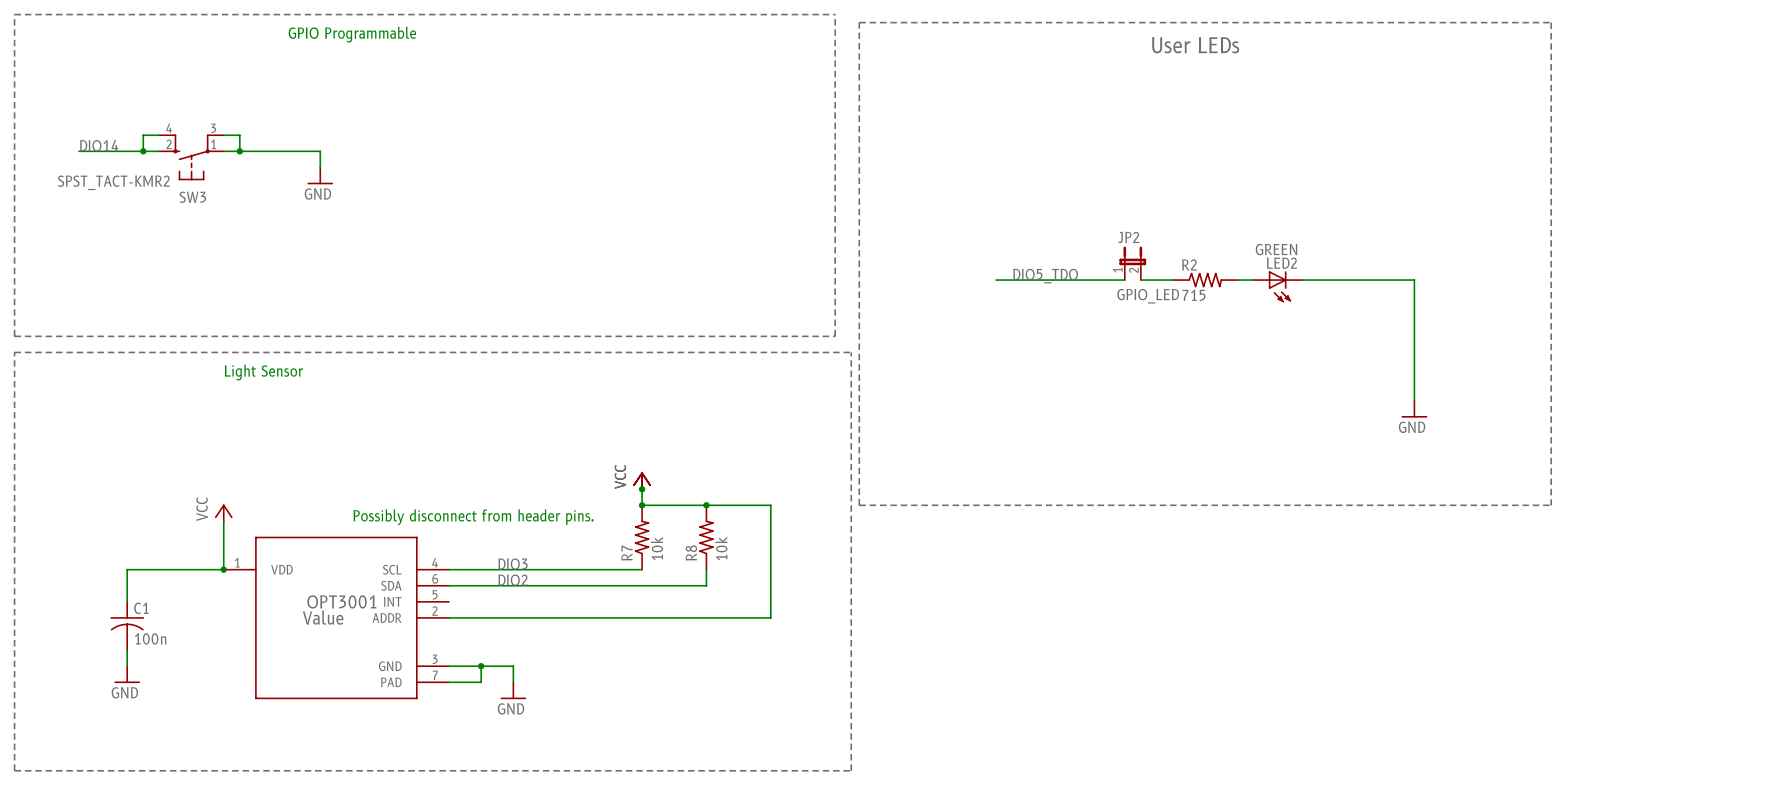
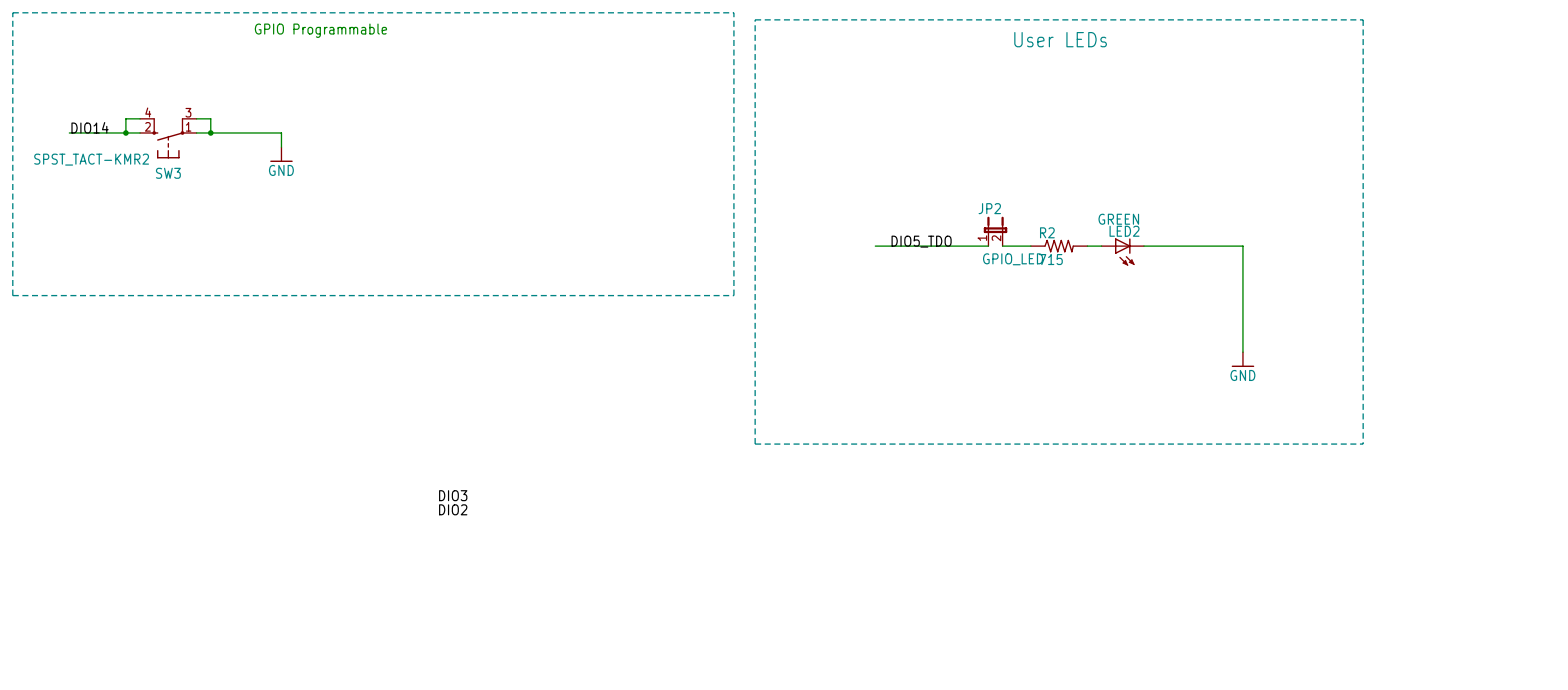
line: (14, 352) (851, 352) (851, 770) (14, 770) (14, 352) -> none
text: Light Sensor (263, 372) -> none
power symbol: VCC (642, 480) -> none
wire: (642, 489) (642, 505) (770, 505) (770, 617) (448, 617) -> none
junction: (642, 489) -> none
junction: (642, 505) -> none
junction: (706, 505) -> none
power symbol: VCC (223, 512) -> none
text: Possibly disconnect from header pins. (473, 517) -> none
wire: (223, 521) (223, 569) (127, 569) (127, 601) -> none
R7: 10k (642, 537) -> none
R8: 10k (706, 537) -> none
junction: (223, 569) -> none
wire: (448, 569) (642, 569) -> none
wire: (706, 569) (706, 585) (448, 585) -> none
OPT3001: Value (336, 617) -> none
C1: 100n (127, 625) -> none
wire: (127, 650) (127, 666) -> none
wire: (448, 666) (513, 666) (513, 682) -> none
wire: (481, 666) (481, 682) (448, 682) -> none
junction: (481, 666) -> none
power symbol: GND (127, 674) -> none
power symbol: GND (513, 690) -> none

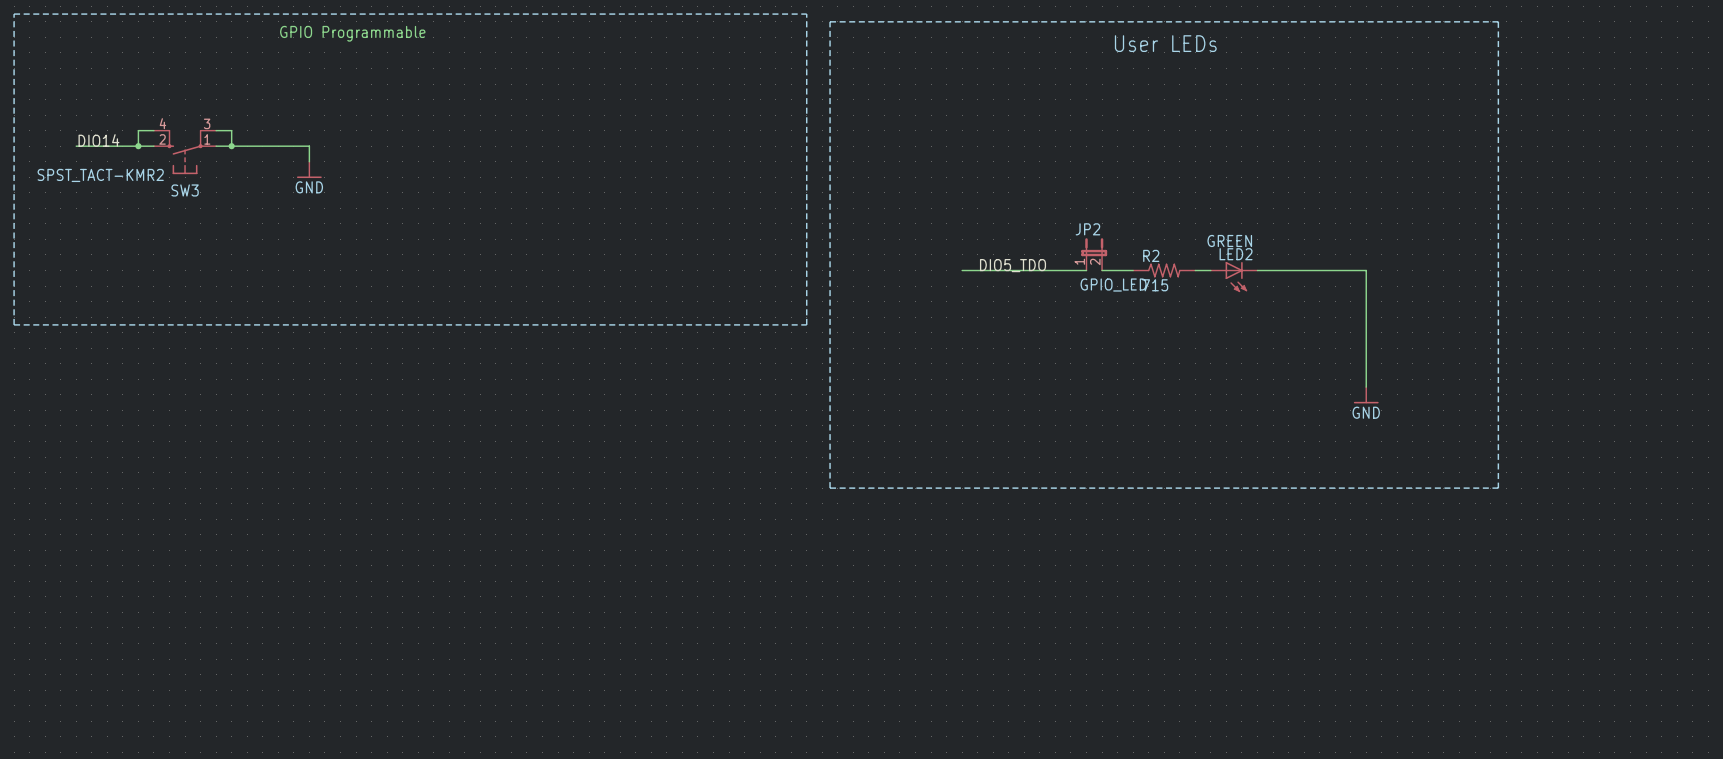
label: DIO3 (453, 495) -> none
label: DIO2 (453, 509) -> none

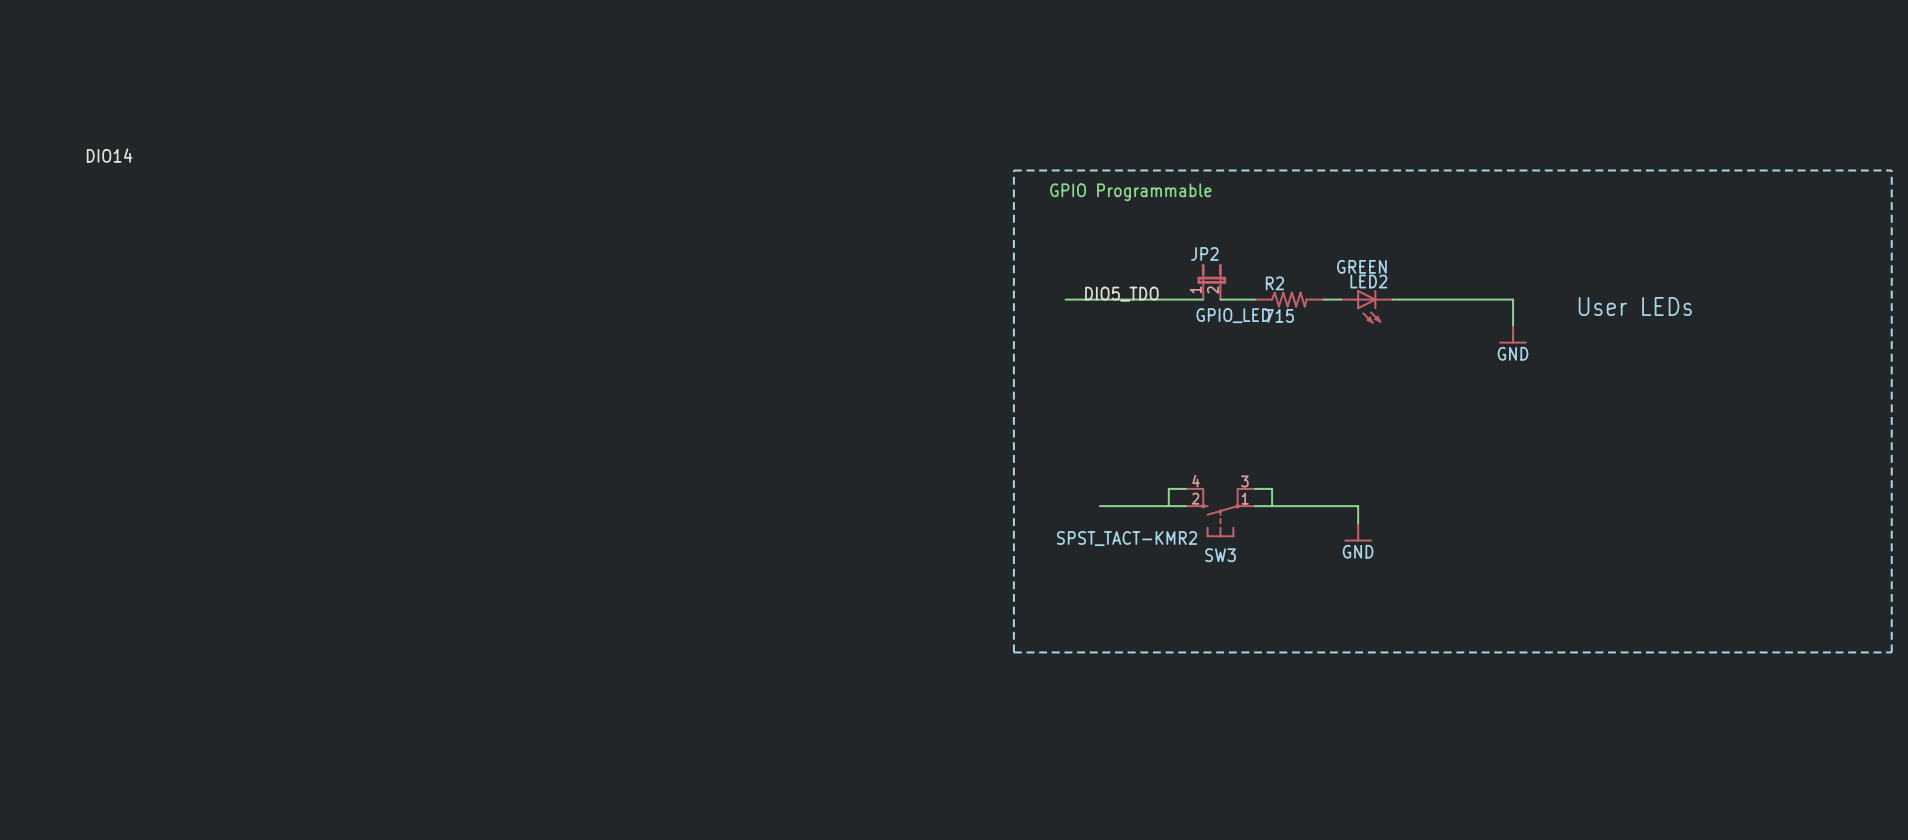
line: (14, 14) (14, 324) (806, 324) (806, 14) (14, 14) -> none
line: (830, 21) (830, 488) (1498, 488) (1498, 21) (830, 21) -> none
text: GPIO Programmable (352, 33) -> none
text: User LEDs (1165, 43) -> none
wire: (153, 130) (138, 130) (138, 146) -> none
wire: (216, 130) (231, 130) (231, 146) -> none
wire: (76, 146) (153, 146) -> none
junction: (138, 146) -> none
wire: (216, 146) (309, 146) (309, 161) -> none
junction: (231, 146) -> none
SW3 position: (185, 152) -> (1220, 512)
line: none -> (1013, 170) (1013, 652) (1891, 652) (1891, 170) (1013, 170)
power symbol: GND (309, 169) -> none
text: none -> GPIO Programmable (1130, 192)
text: none -> User LEDs (1635, 306)
wire: (1366, 293) (1366, 387) -> none
power symbol: none -> GND (1513, 334)
power symbol: GND (1366, 395) -> none
wire: none -> (1186, 488) (1168, 488) (1168, 506)
wire: none -> (1254, 488) (1272, 488) (1272, 506)
wire: none -> (1099, 506) (1186, 506)
wire: none -> (1254, 506) (1358, 506) (1358, 523)
power symbol: none -> GND (1358, 532)

